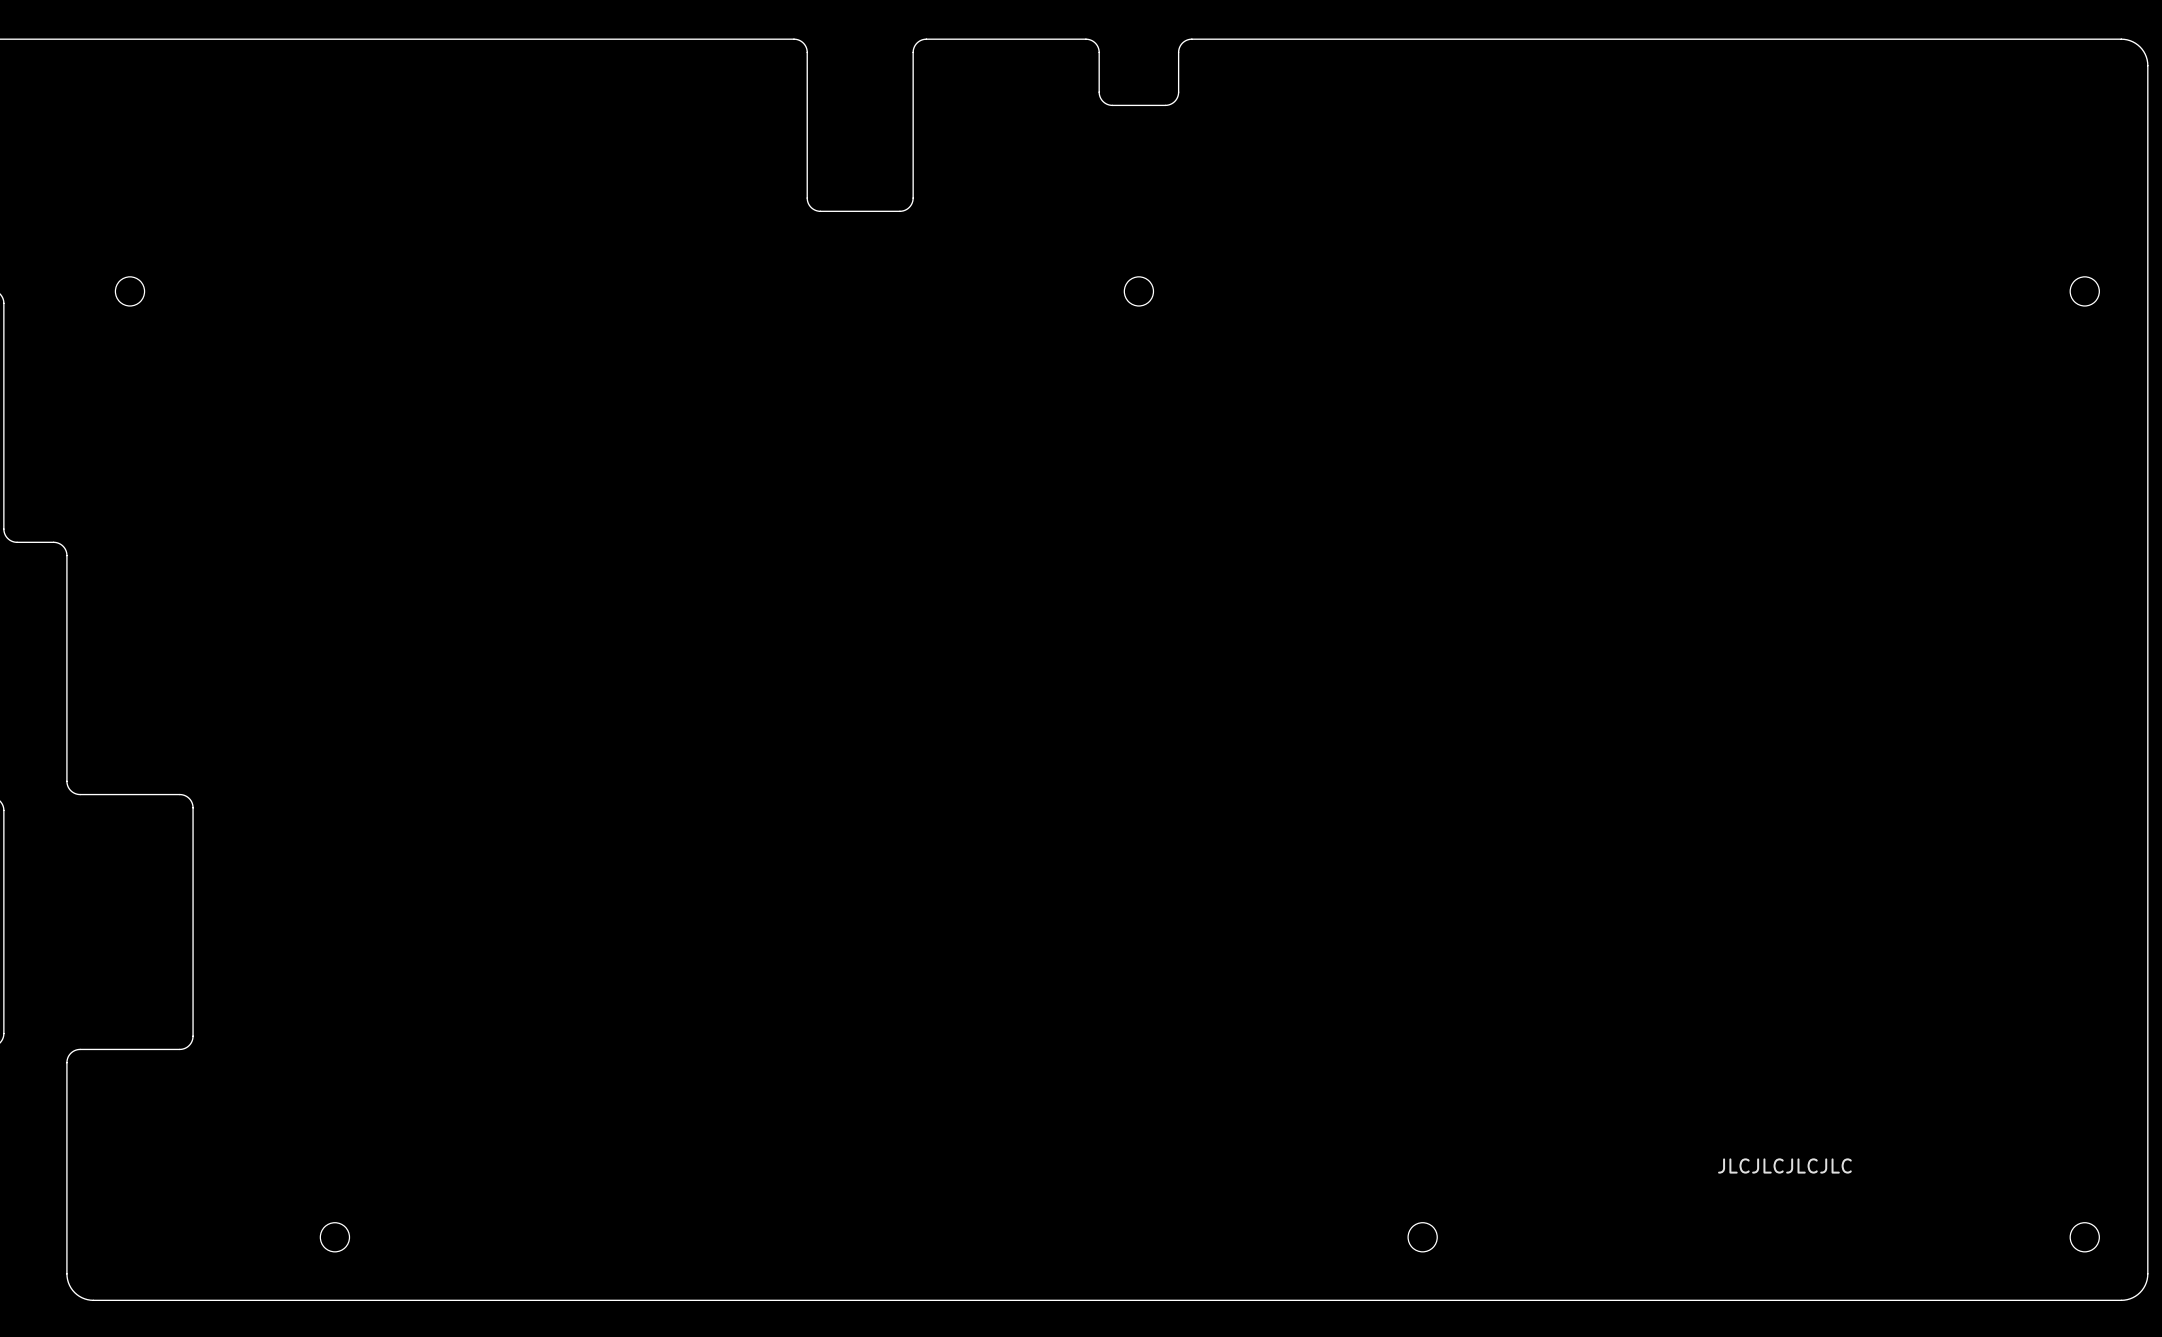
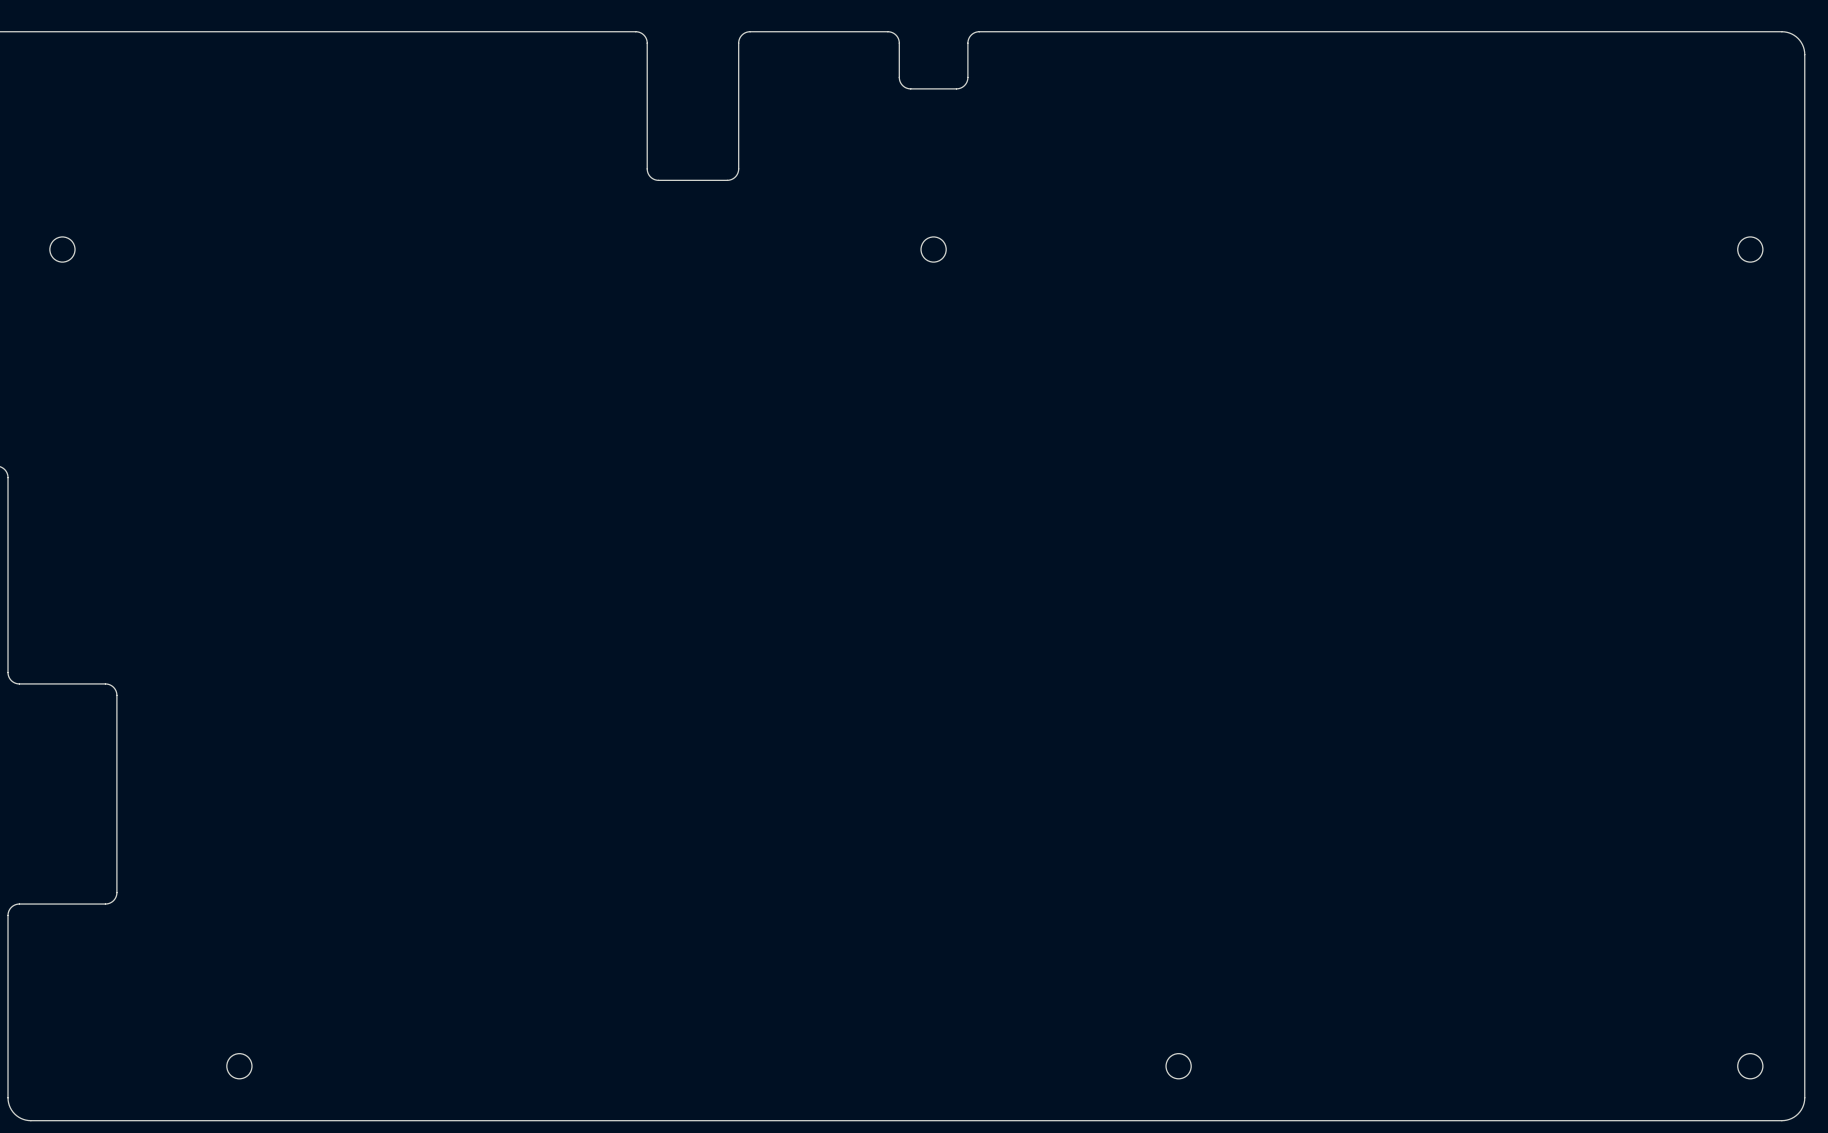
text: JLCJLCJLCJLC (1784, 1165) -> none

